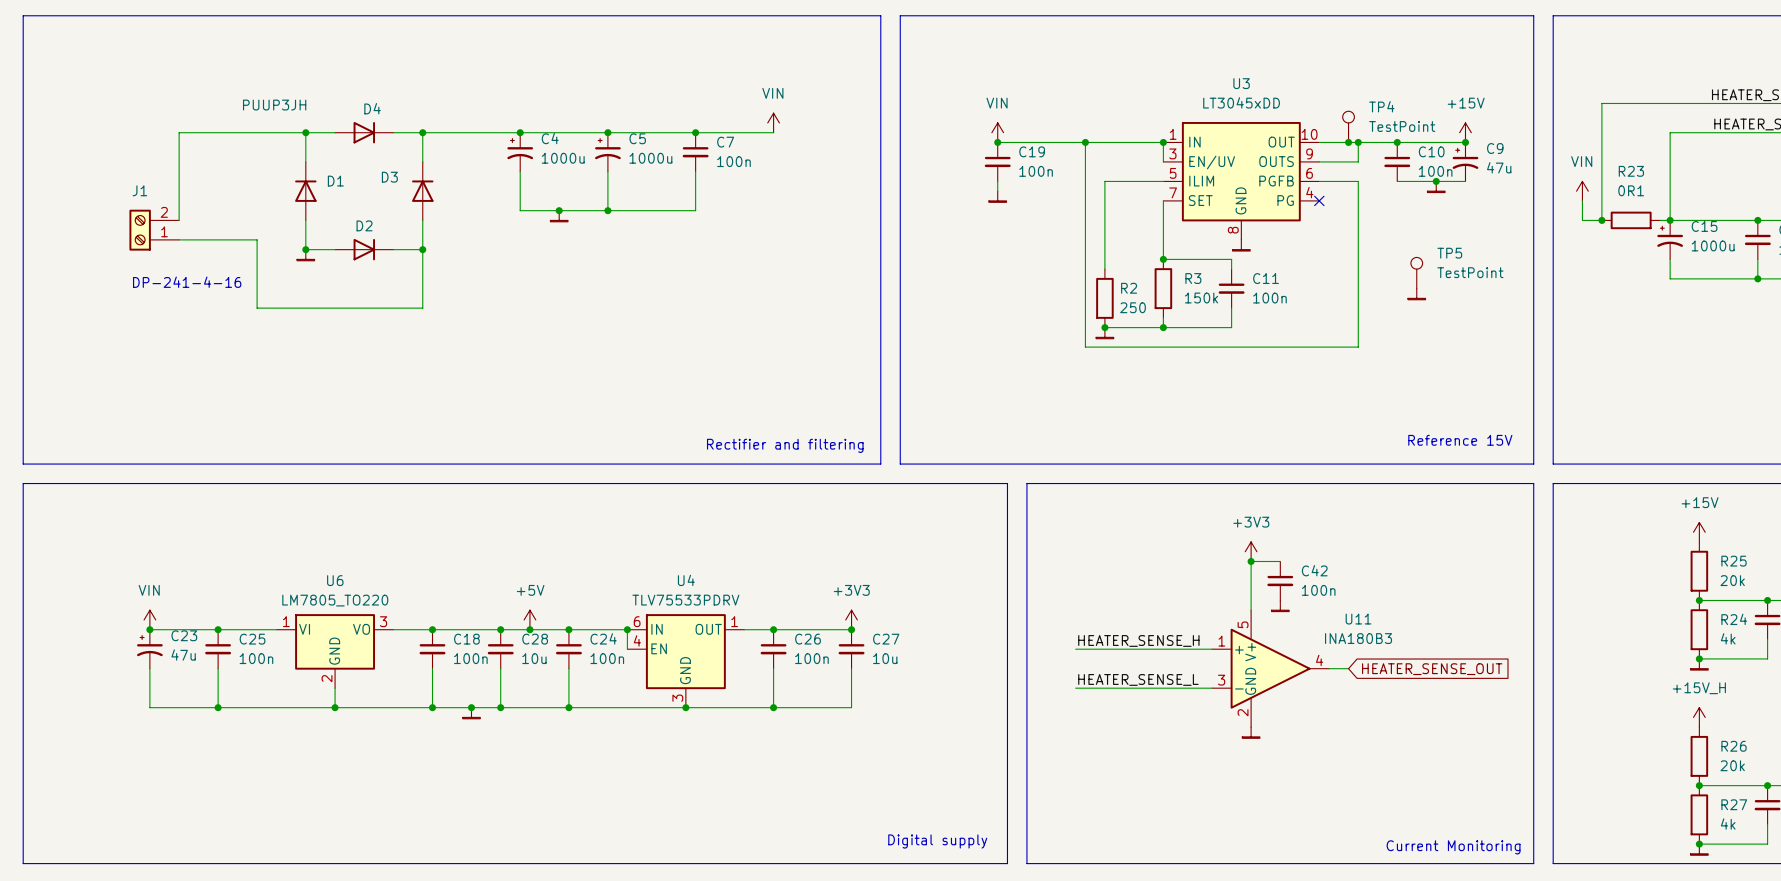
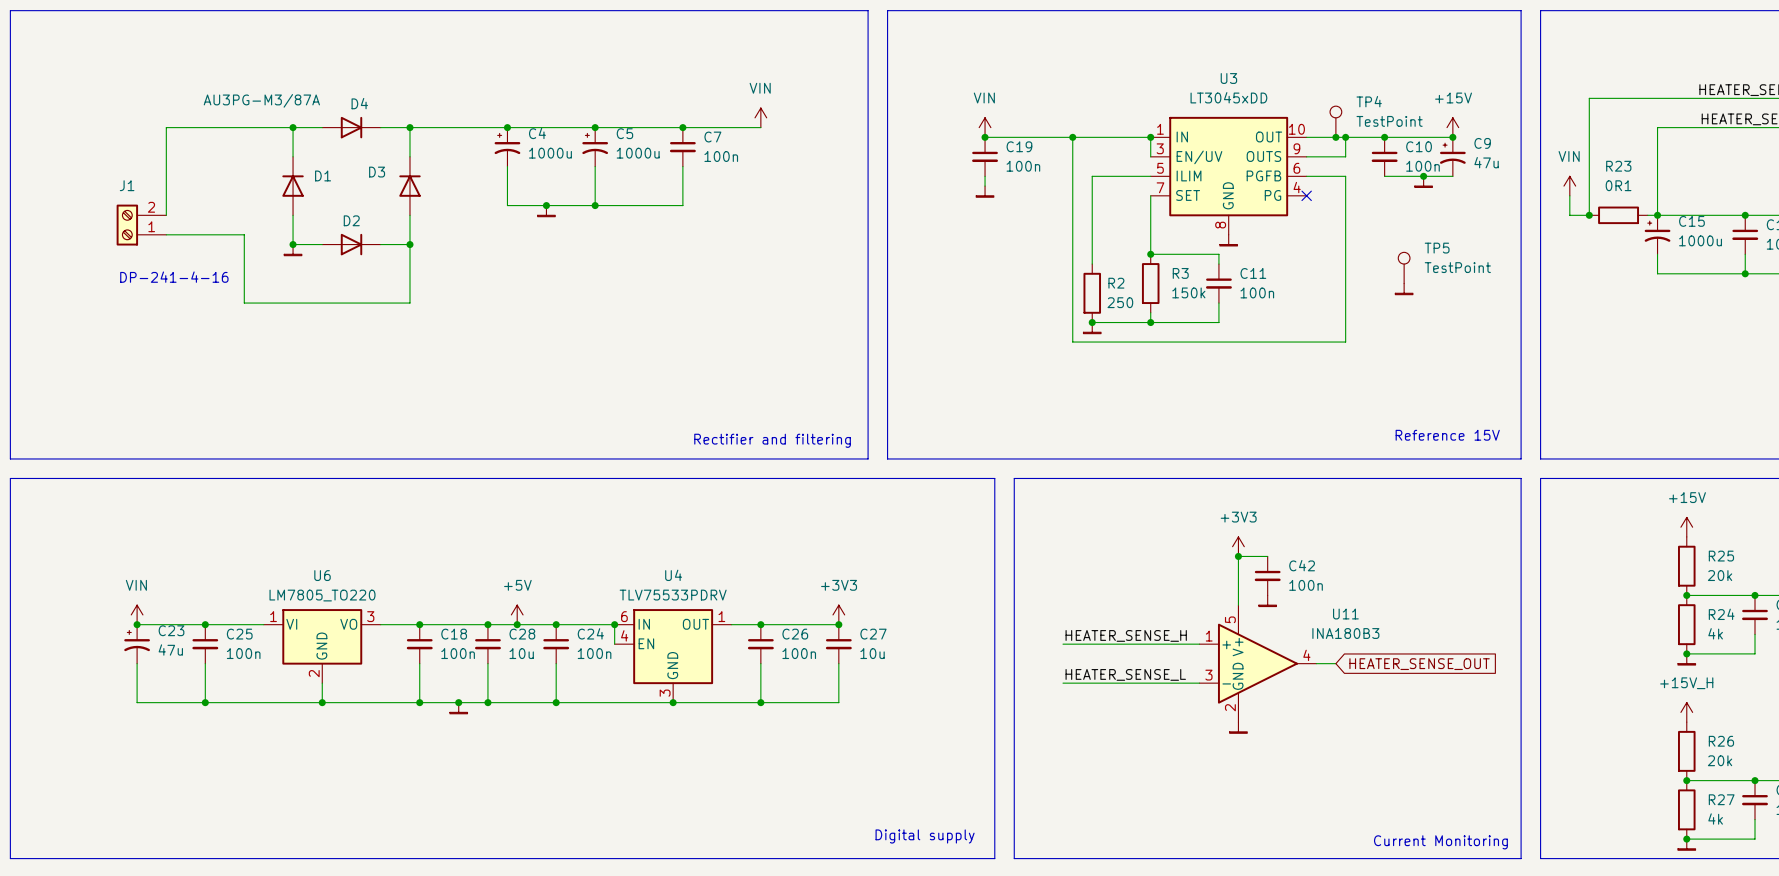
D2 value: PUUP3JH (274, 105) -> AU3PG-M3/87A (261, 100)

